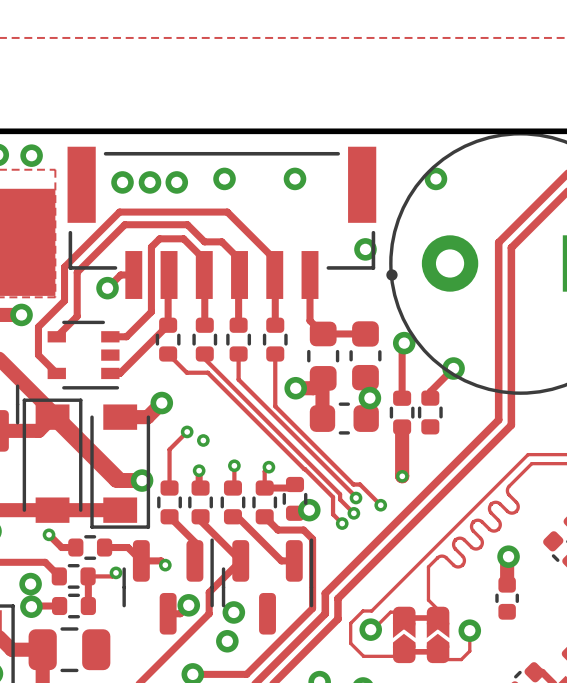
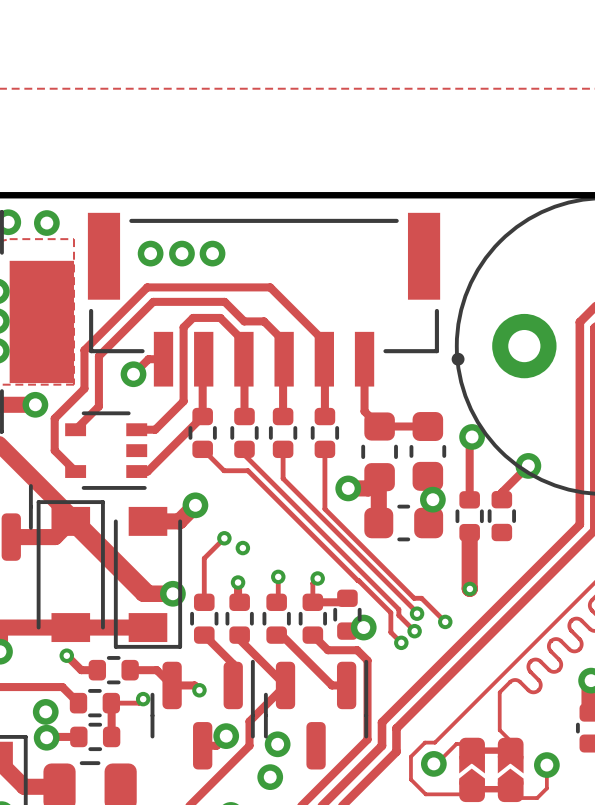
via: (224, 178) -> none
via: (295, 178) -> none
via: (435, 178) -> none
via: (365, 249) -> none

